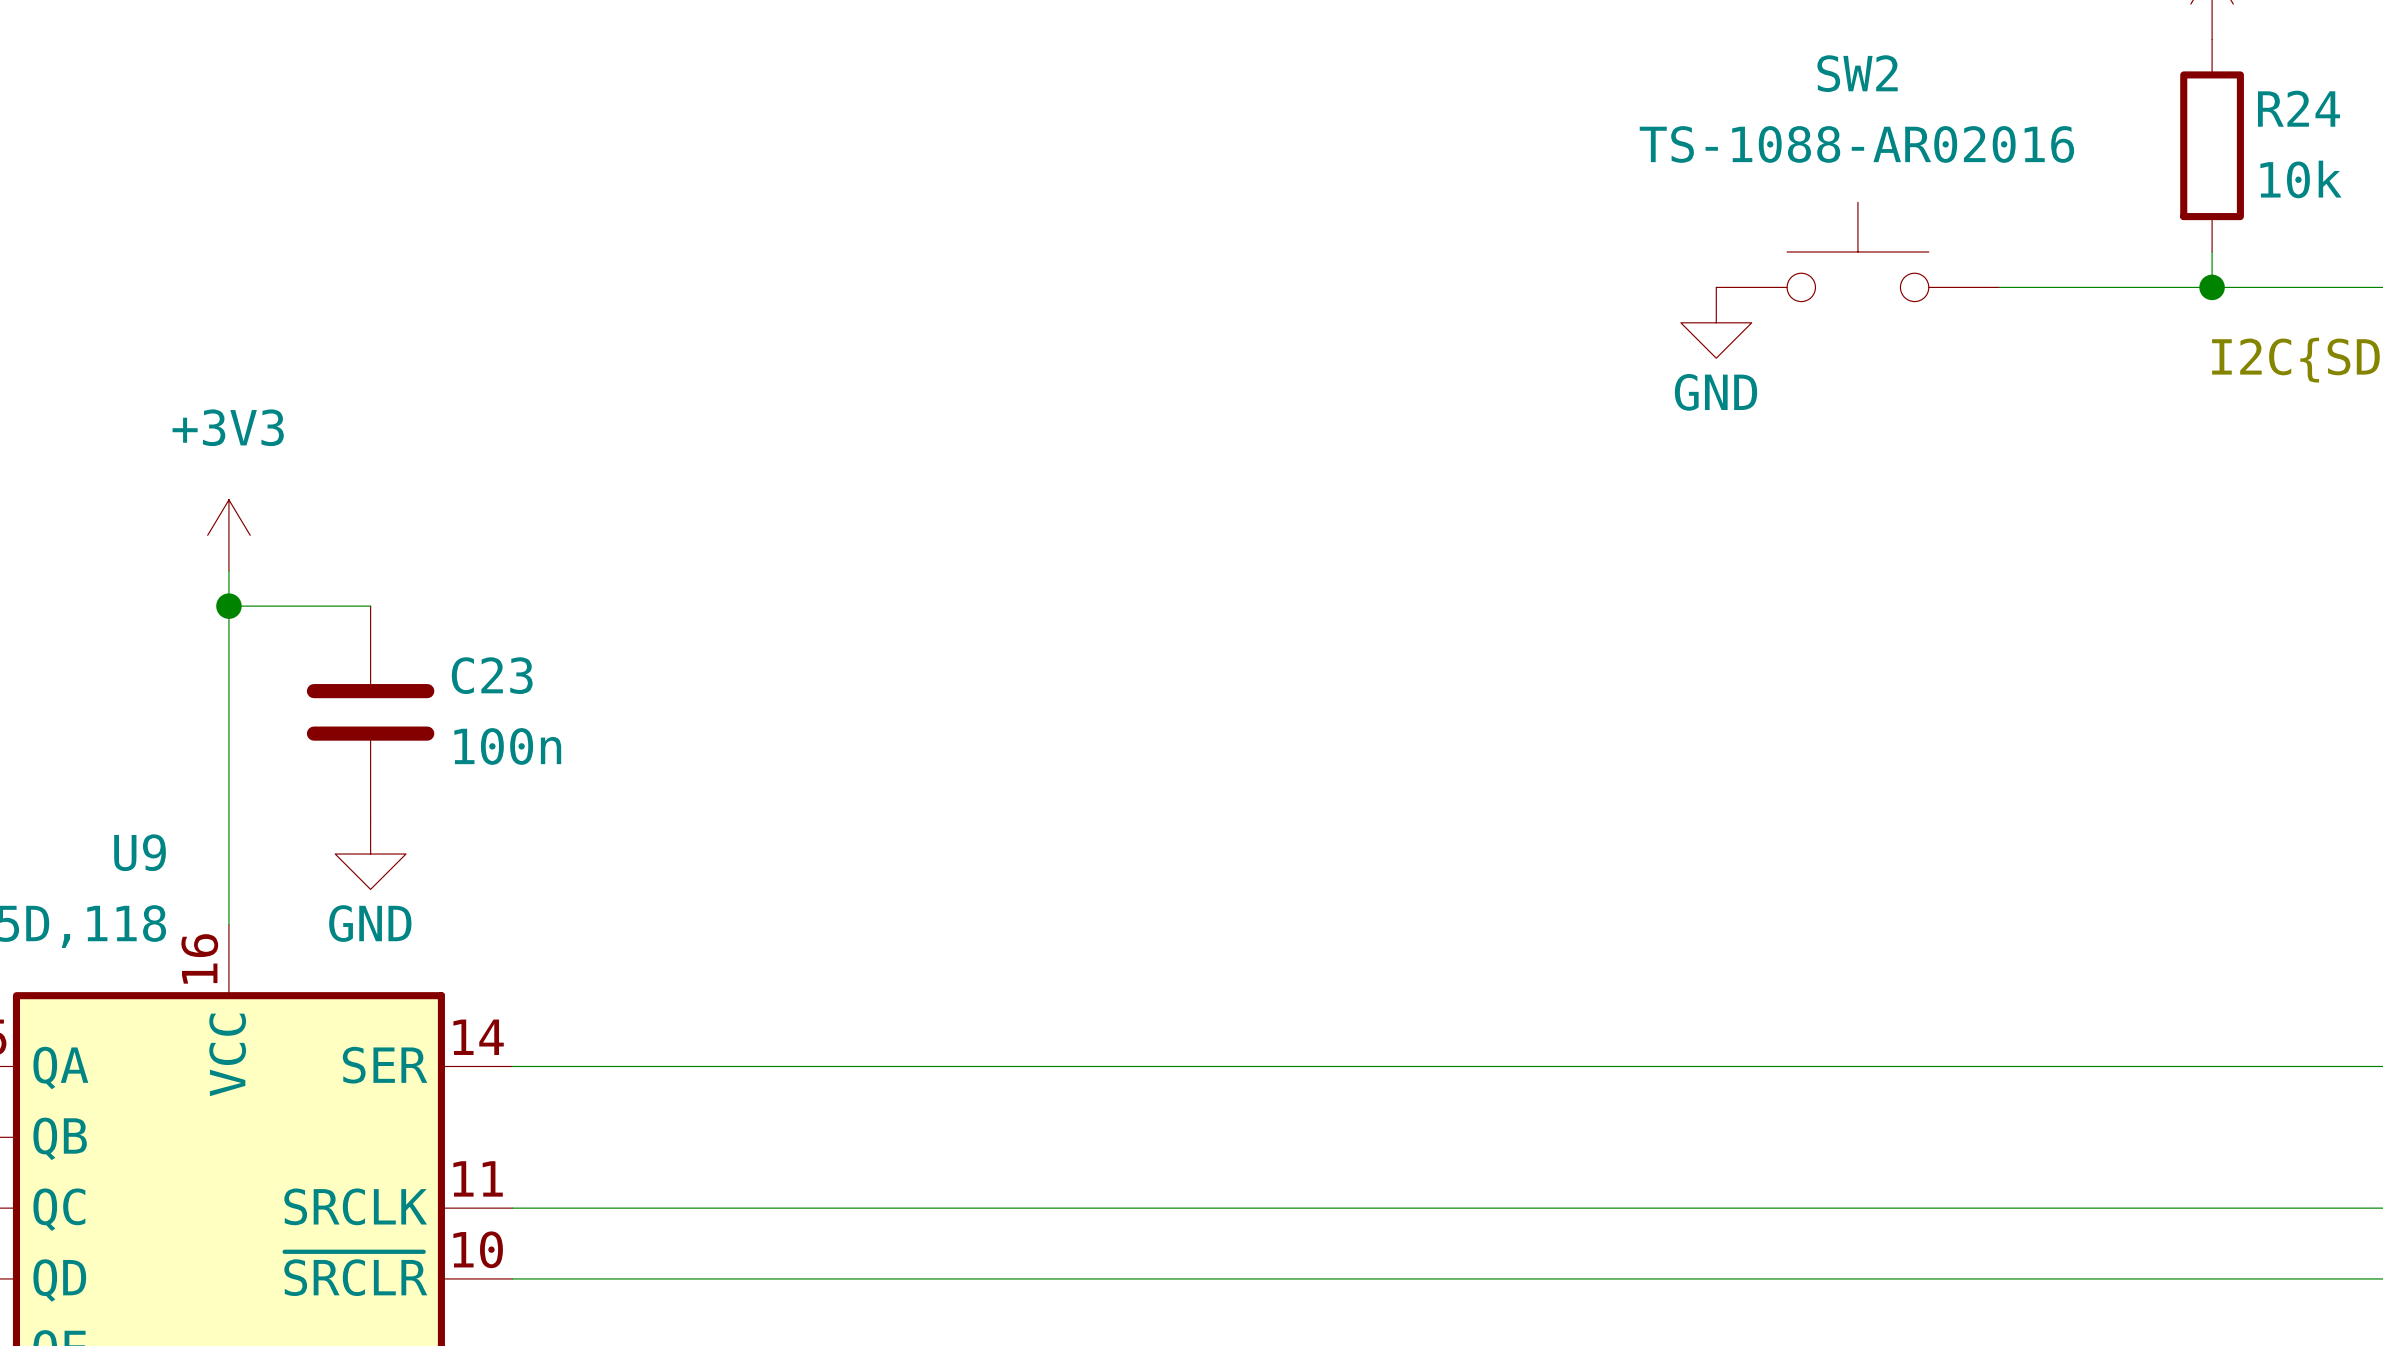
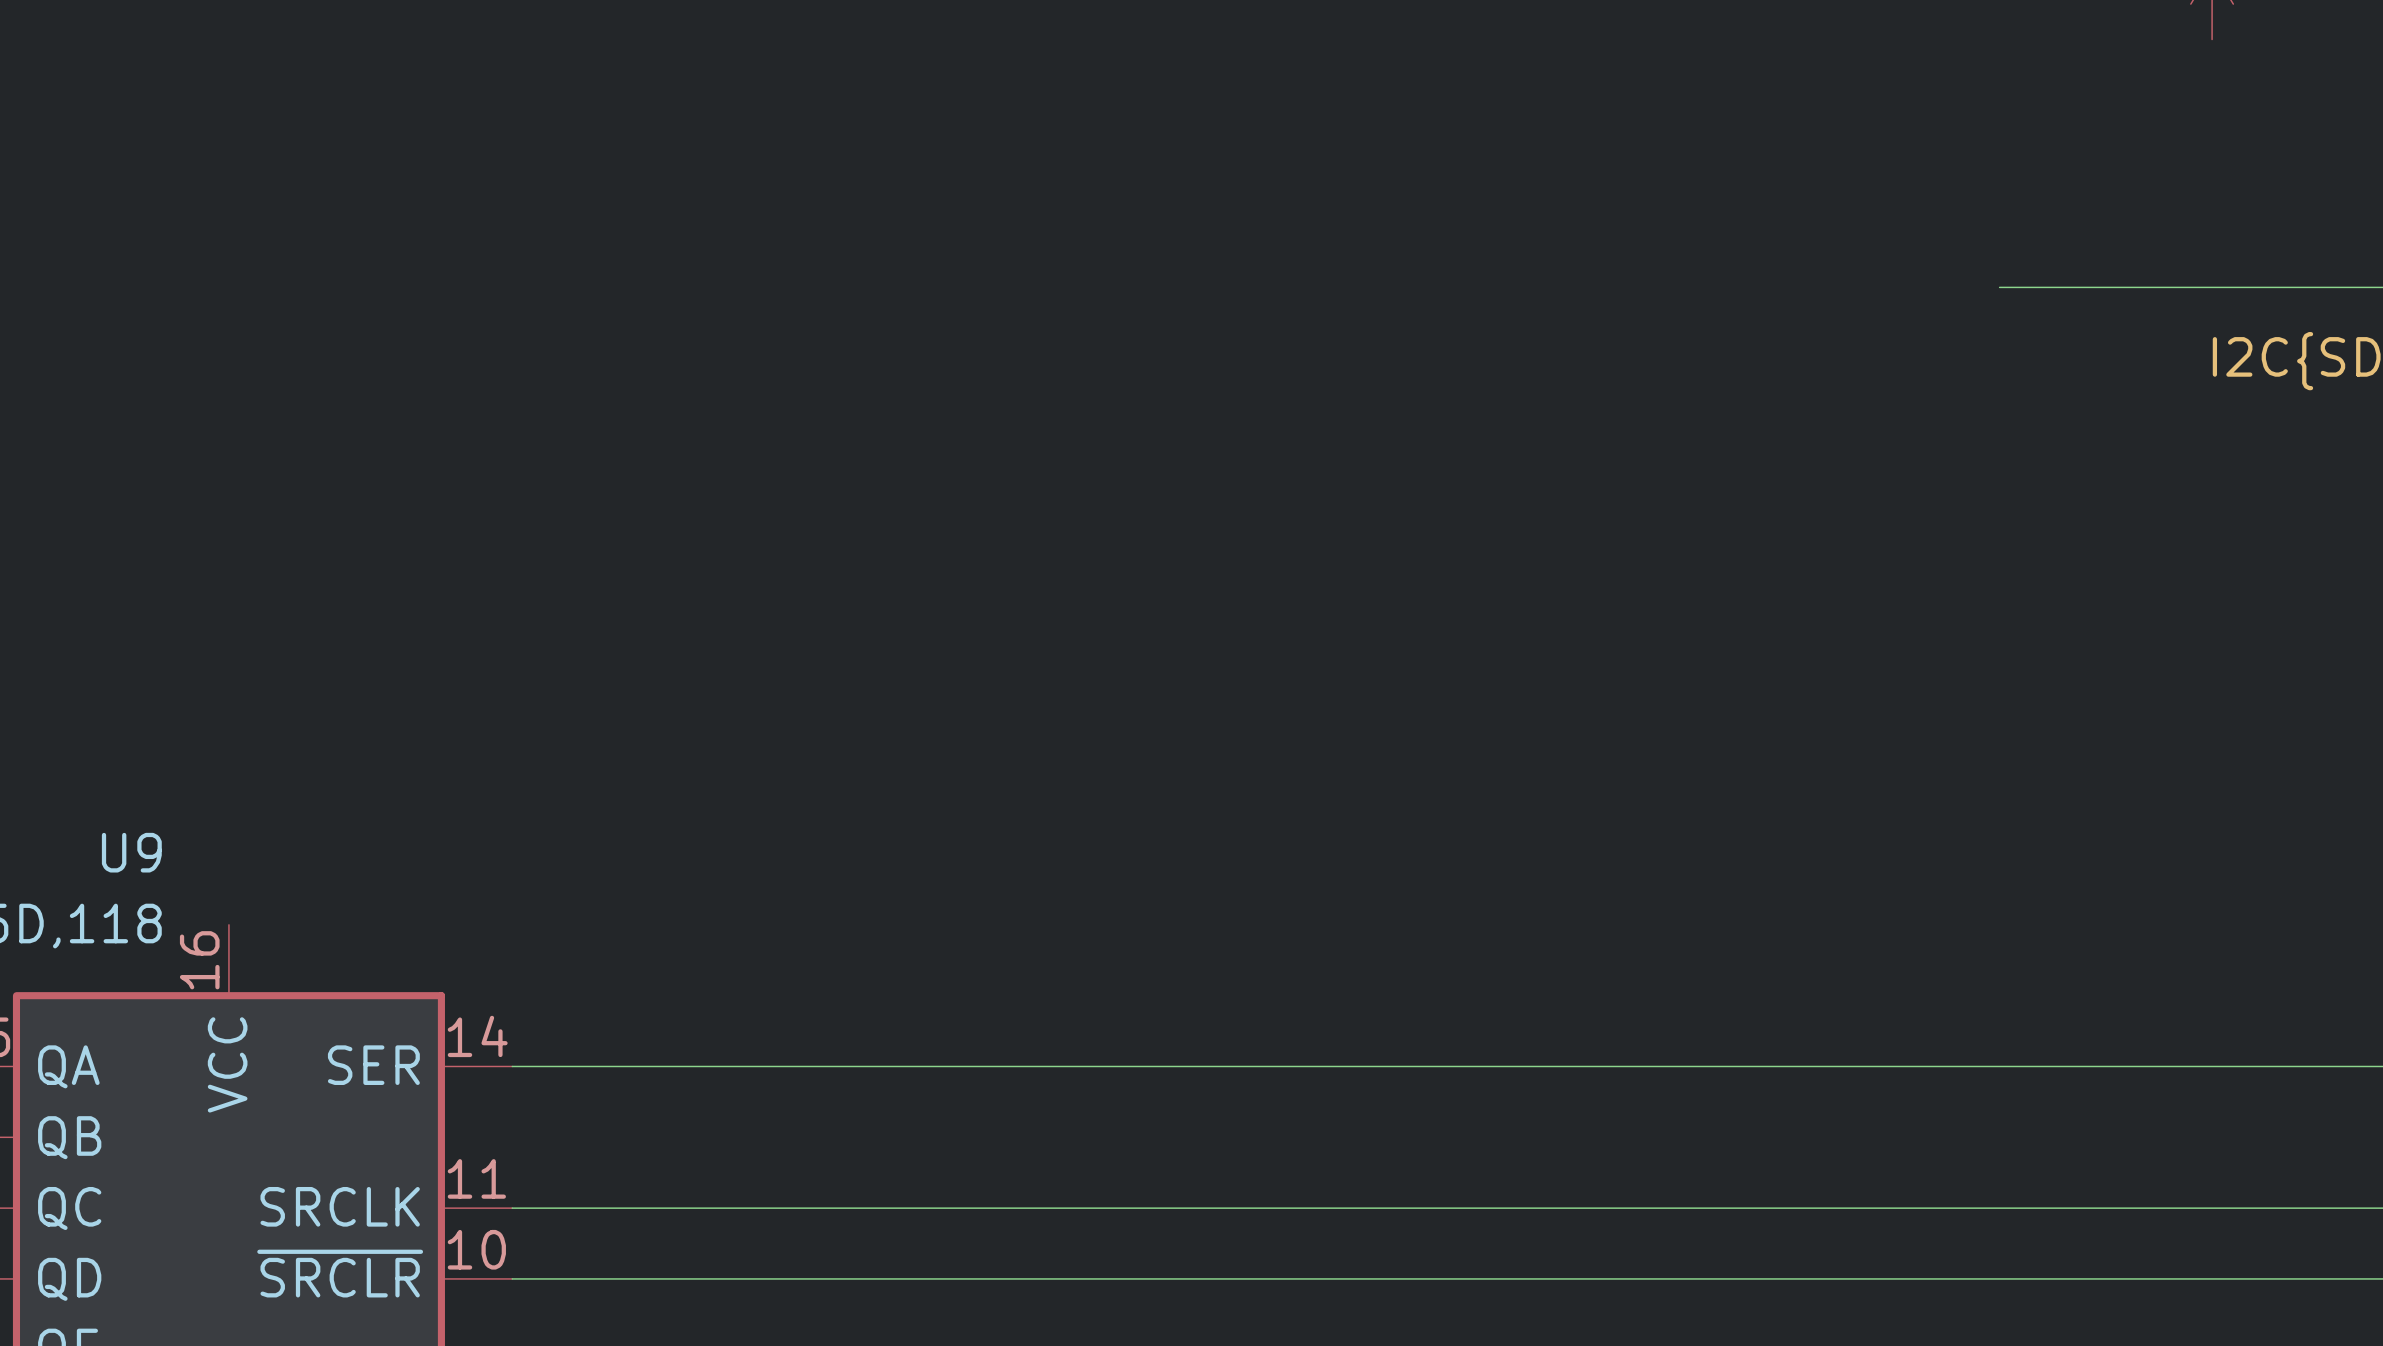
R24: 10k (2212, 145) -> none
SW2: TS-1088-AR02016 (1857, 251) -> none
wire: (2212, 251) (2212, 287) -> none
junction: (2212, 287) -> none
power symbol: GND (1716, 322) -> none
power symbol: +3V3 (228, 535) -> none
wire: (228, 570) (228, 924) -> none
wire: (228, 606) (370, 606) -> none
junction: (228, 606) -> none
C23: 100n (370, 712) -> none
power symbol: GND (370, 854) -> none

